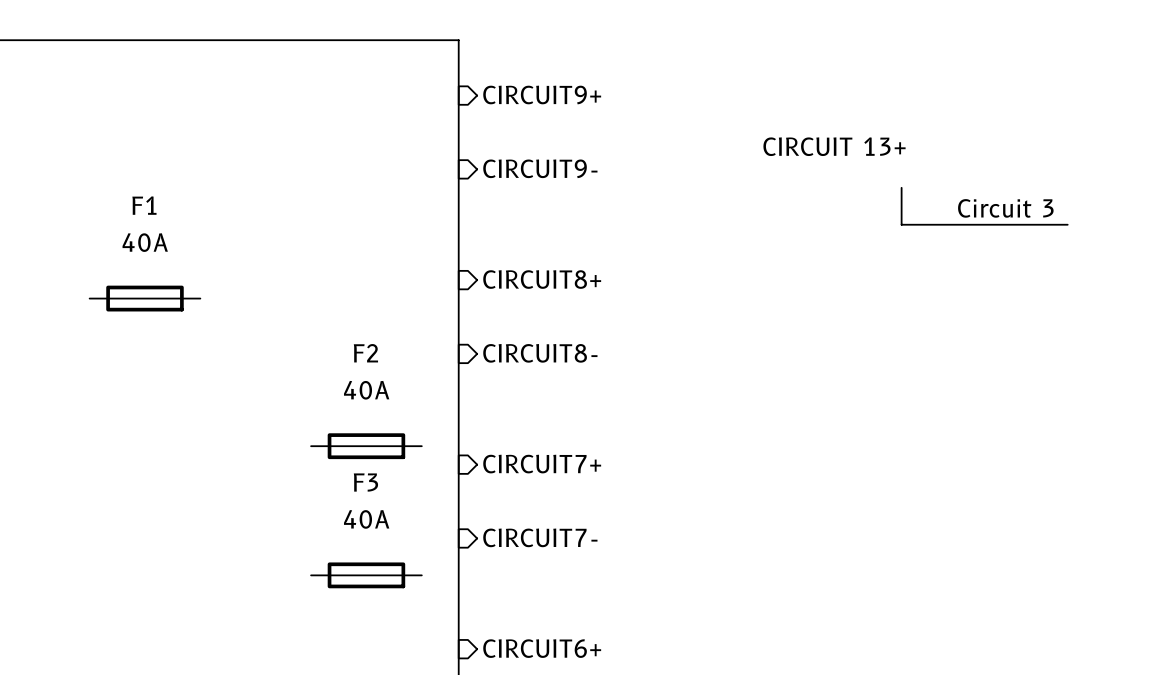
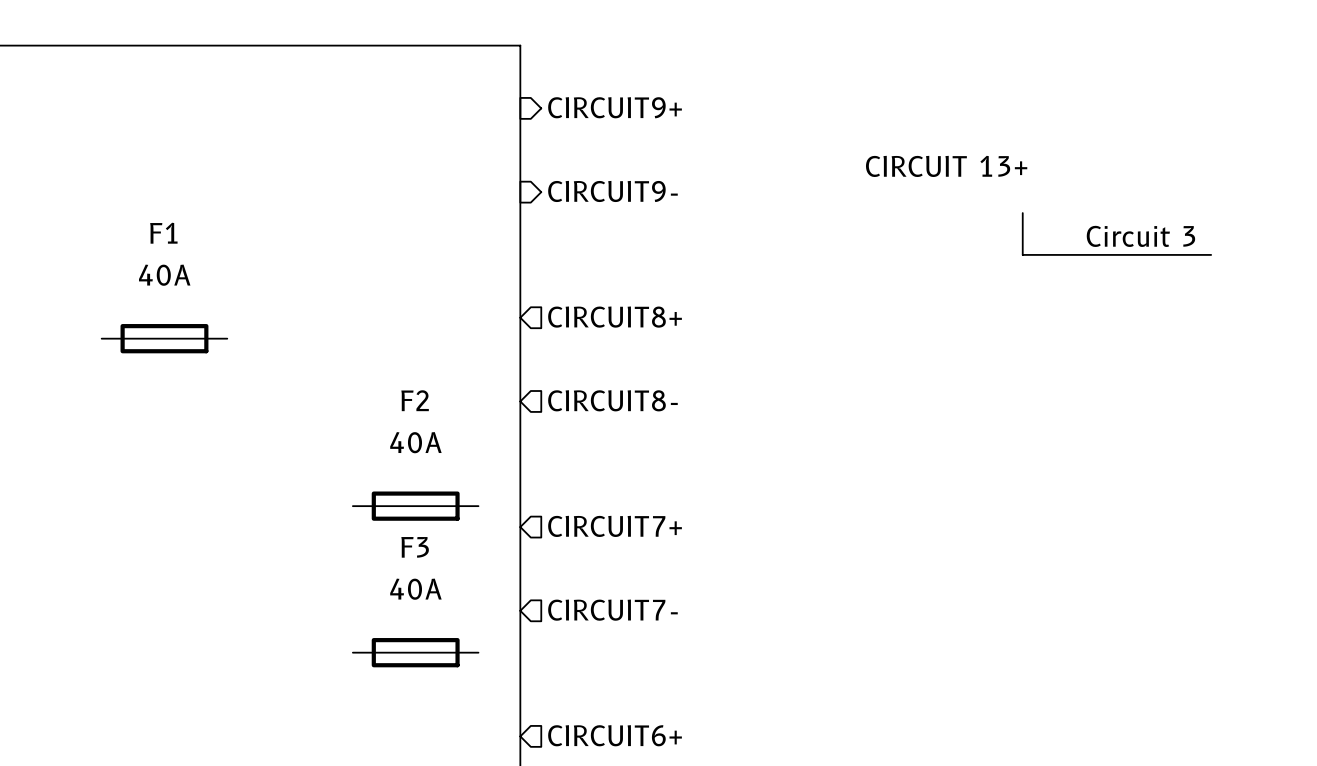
hierarchical label shape: output (542, 279) -> input (615, 317)
hierarchical label shape: output (540, 353) -> input (612, 400)
hierarchical label shape: output (542, 464) -> input (615, 526)
hierarchical label shape: output (540, 537) -> input (612, 610)
hierarchical label shape: output (542, 648) -> input (615, 735)

